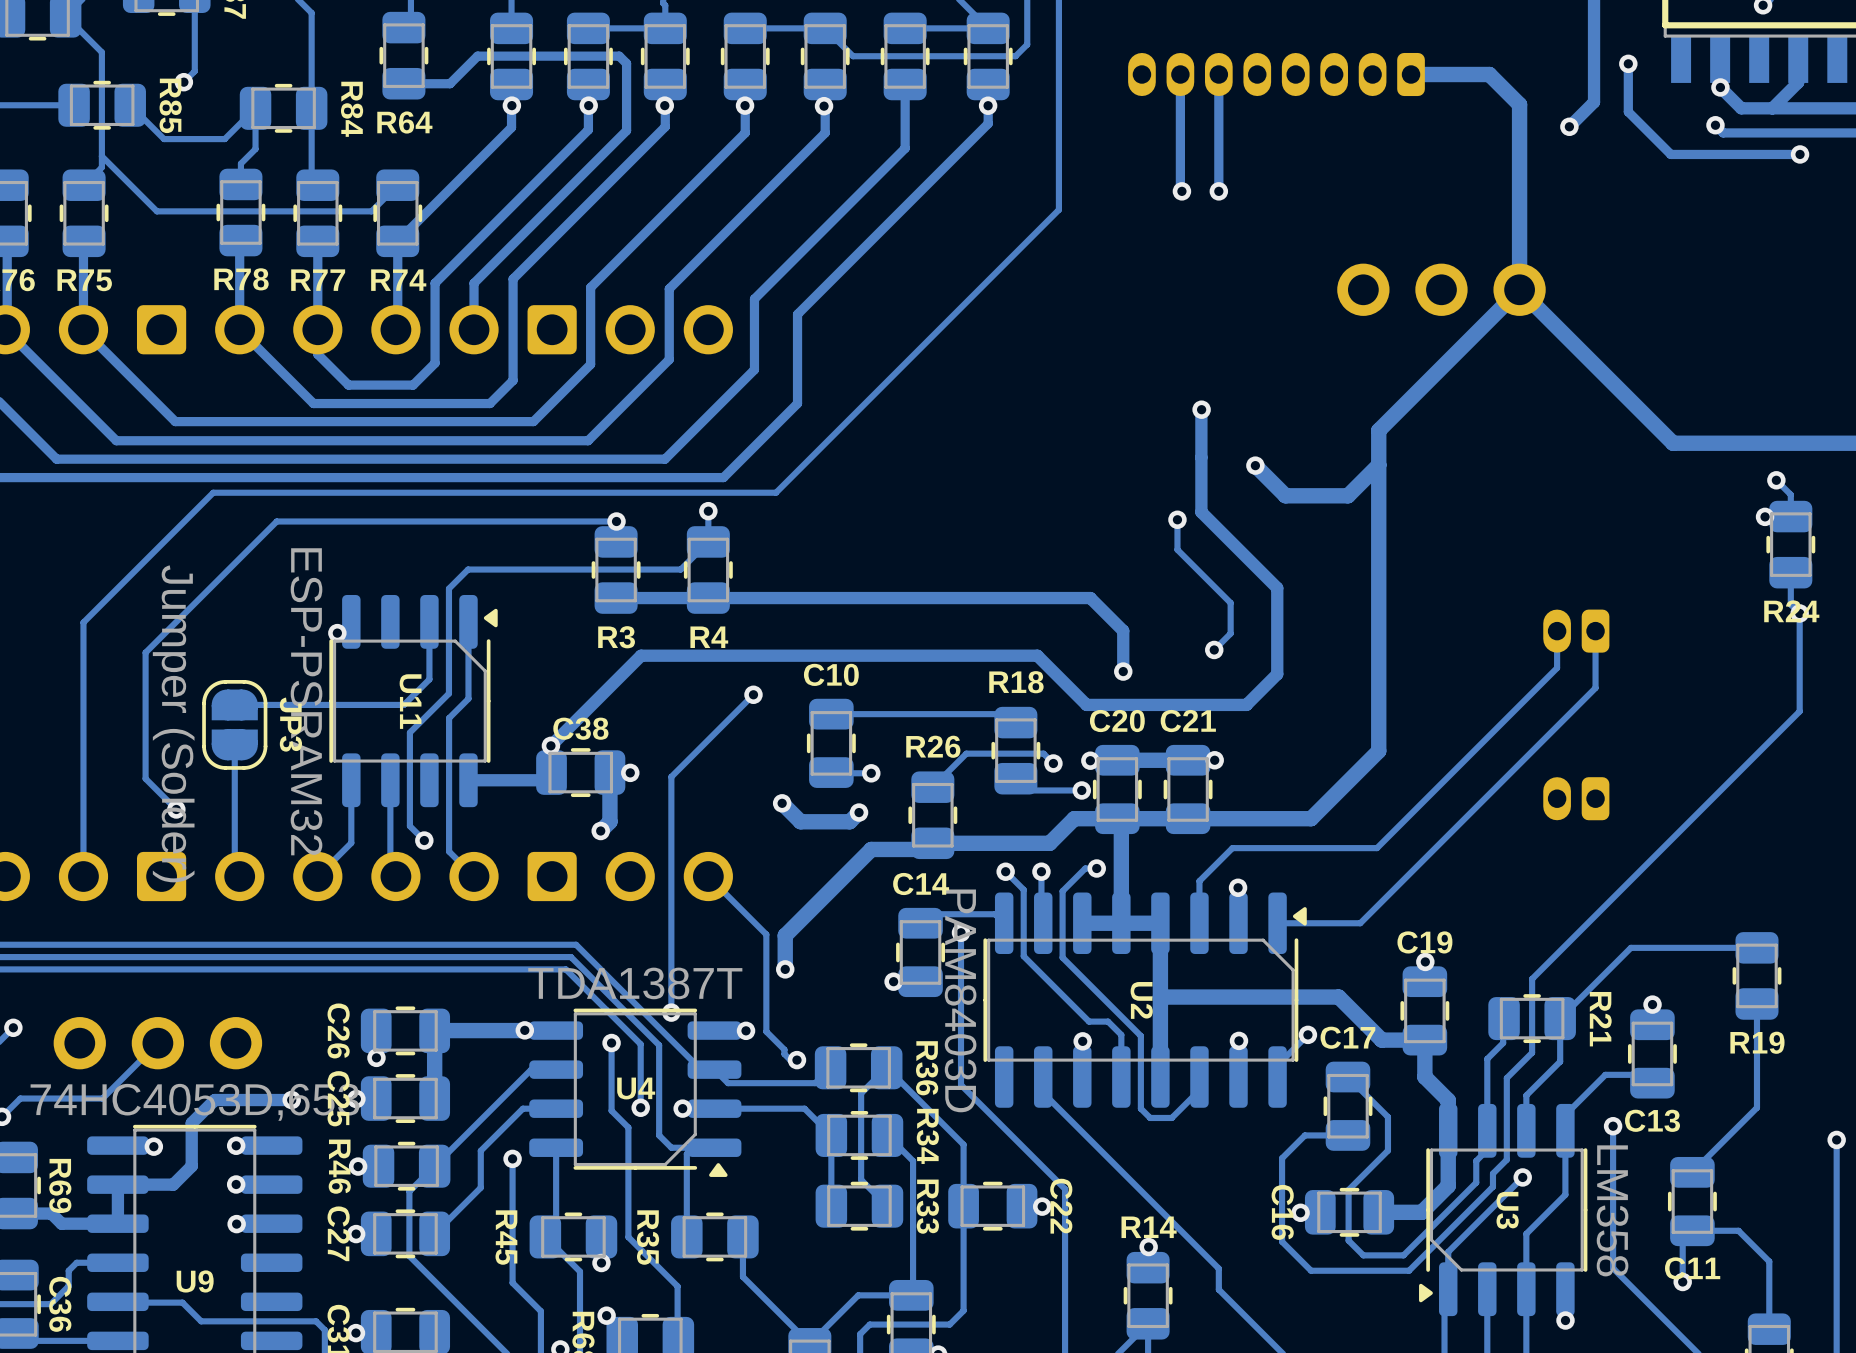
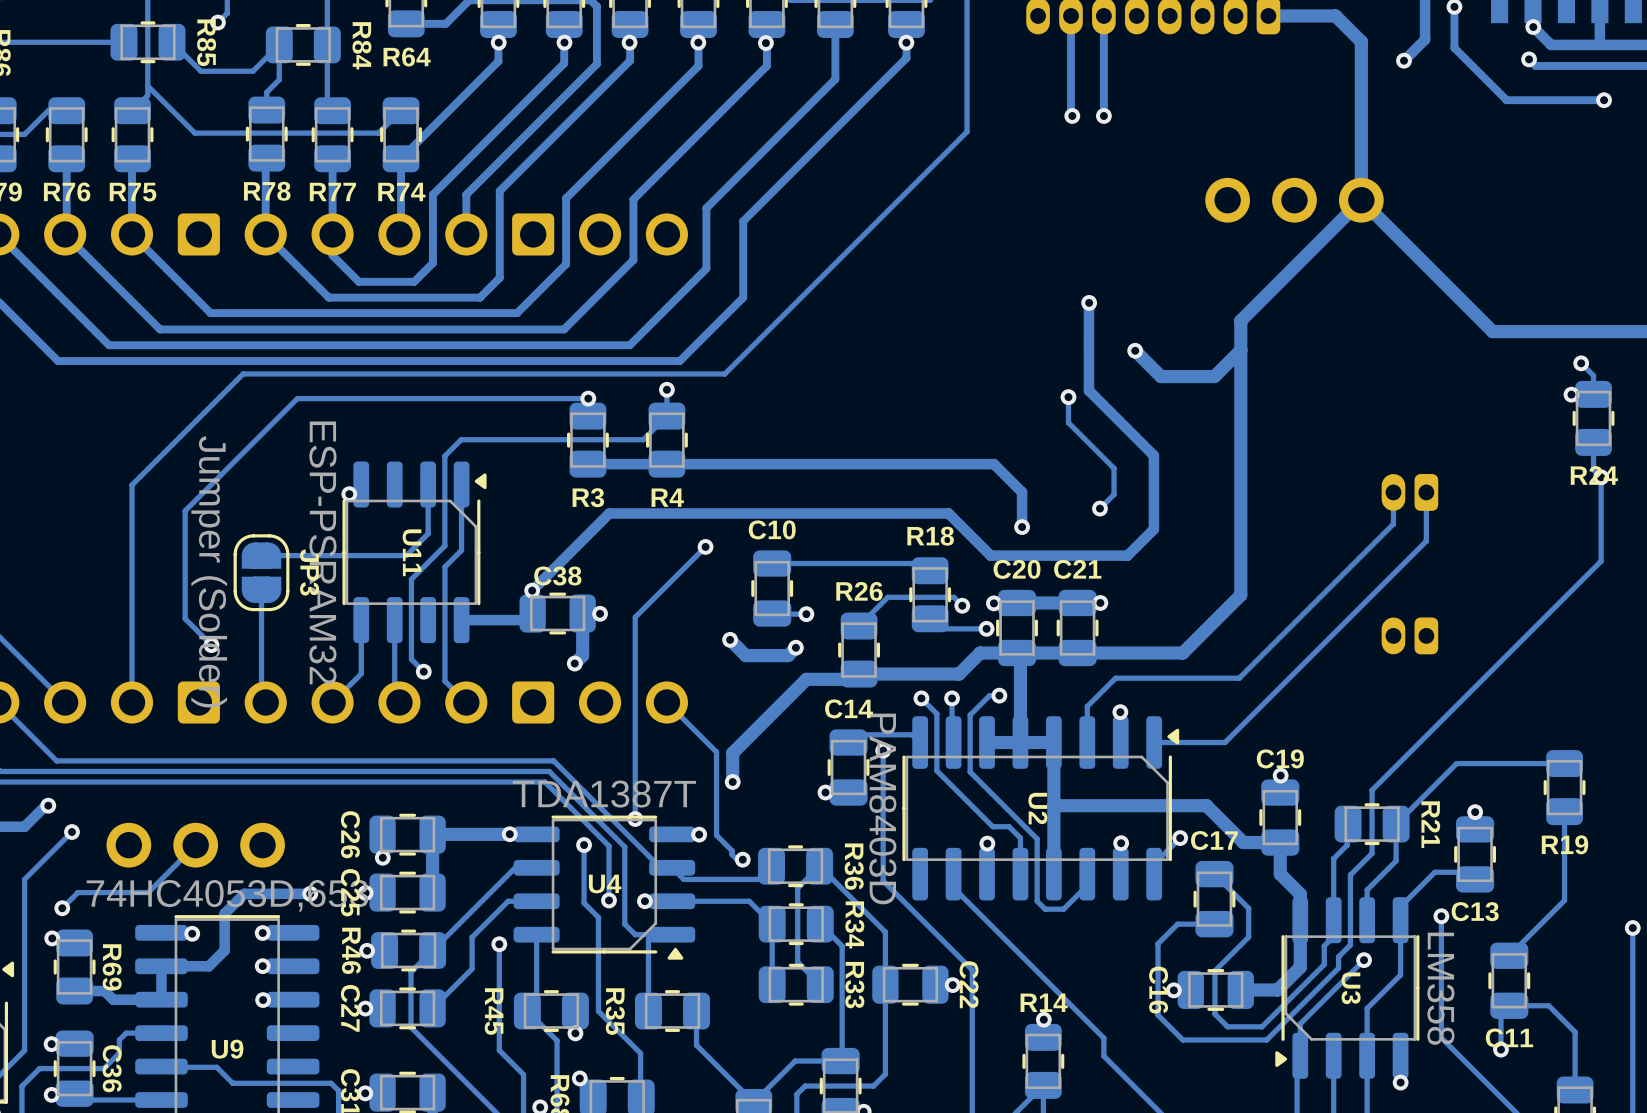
track: (1798, 82) (1772, 108) -> (1599, 22) (1599, 43)
track: (1628, 111) (1670, 154) (1800, 154) -> (1454, 47) (1506, 100) (1604, 100)
via position: (1800, 154) -> (1604, 100)

